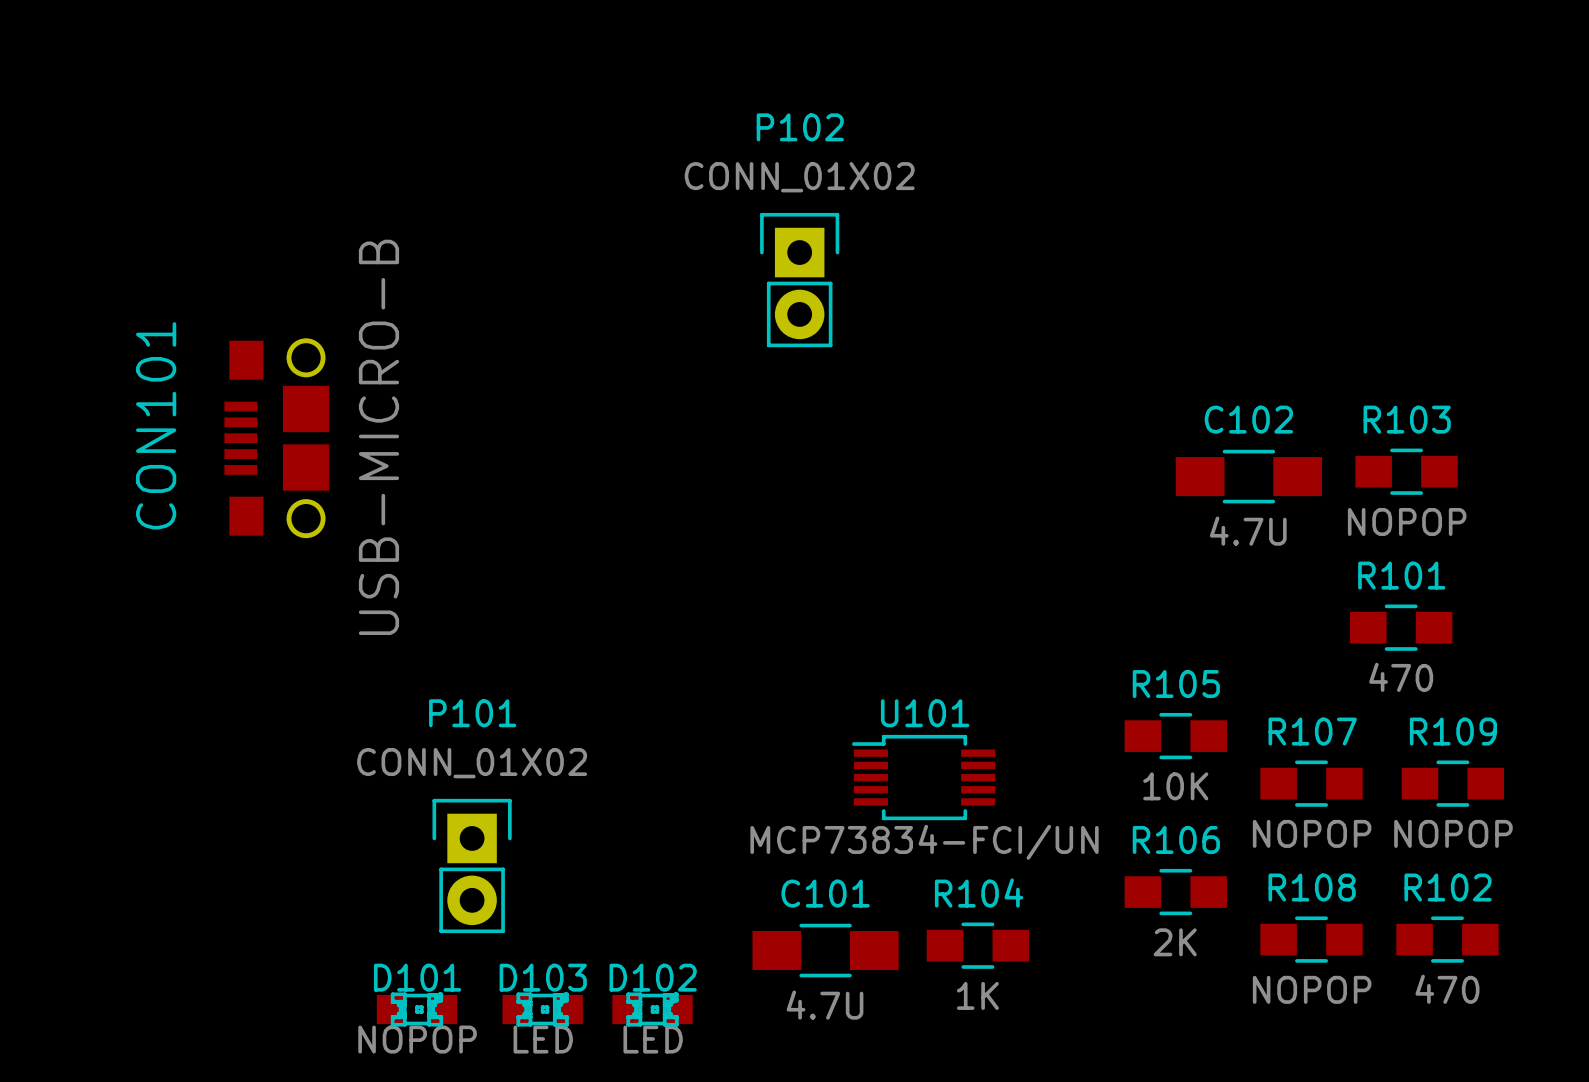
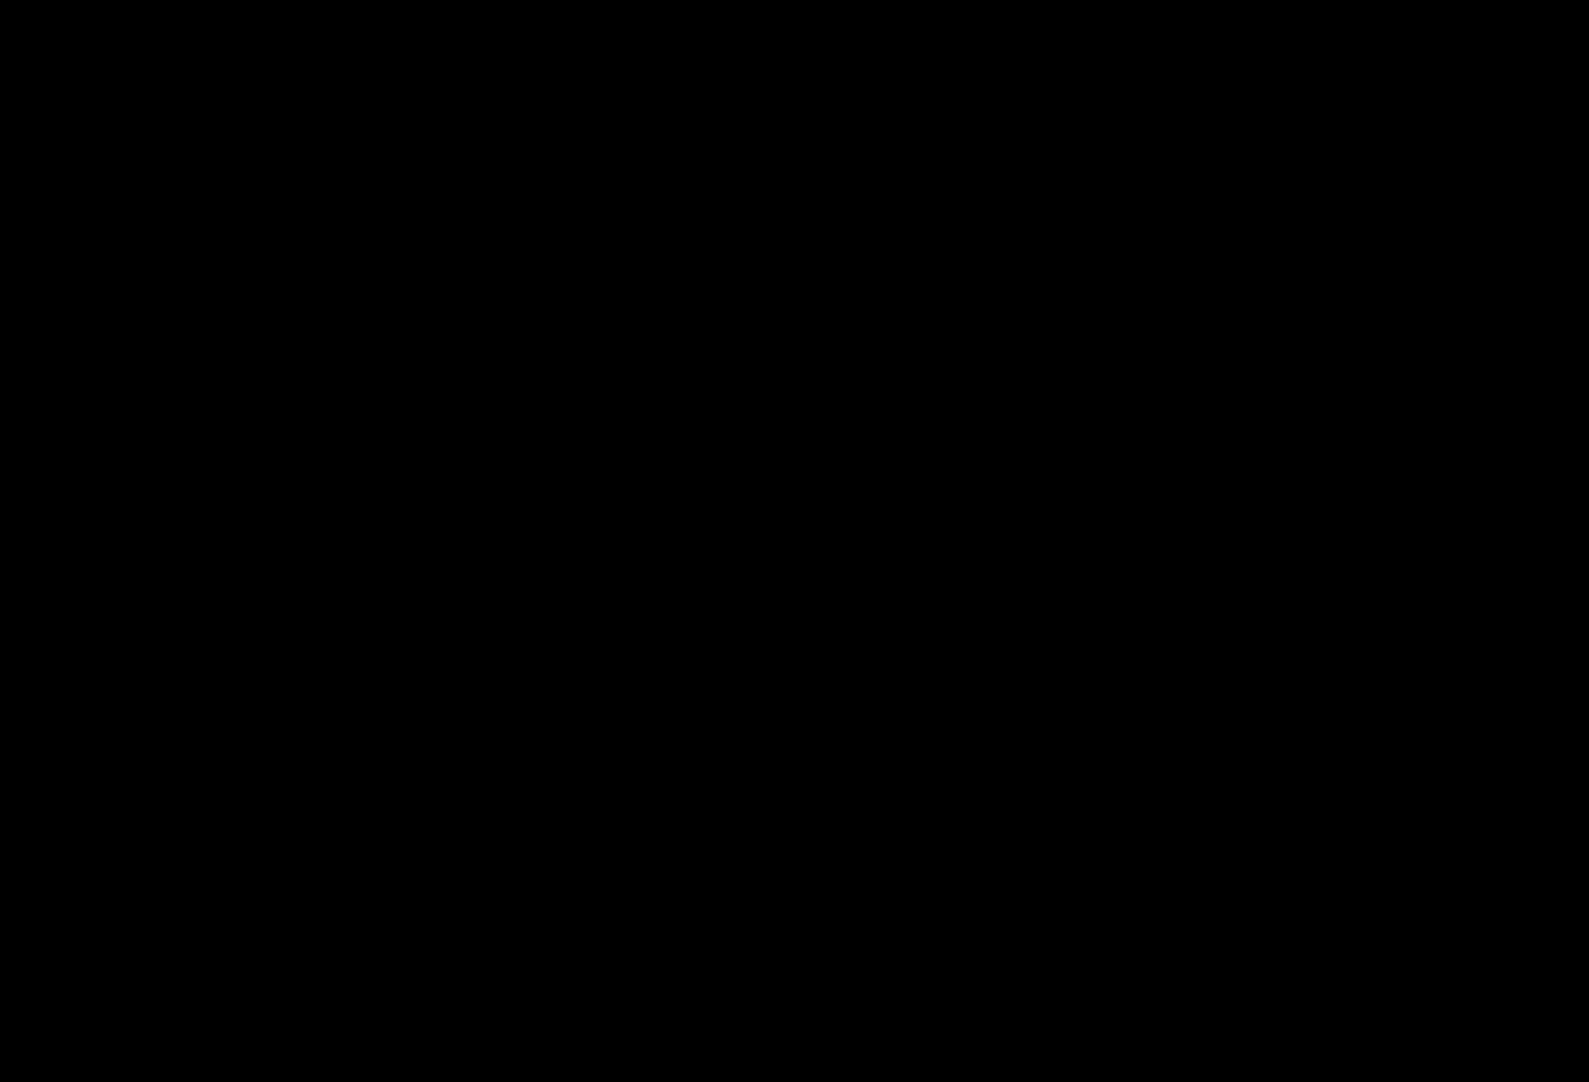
P102: CONN_01X02 (799, 280) -> none
CON101: USB-MICRO-B (276, 438) -> none
R103: NOPOP (1406, 471) -> none
C102: 4.7U (1248, 476) -> none
R101: 470 (1401, 627) -> none
R105: 10K (1175, 736) -> none
U101: MCP73834-FCI/UN (923, 777) -> none
R107: NOPOP (1311, 783) -> none
R109: NOPOP (1452, 783) -> none
P101: CONN_01X02 (472, 865) -> none
R106: 2K (1175, 892) -> none
R108: NOPOP (1311, 939) -> none
R102: 470 (1447, 939) -> none
R104: 1K (977, 945) -> none
C101: 4.7U (825, 950) -> none
D101: NOPOP (416, 1009) -> none
D103: LED (542, 1009) -> none
D102: LED (652, 1009) -> none

